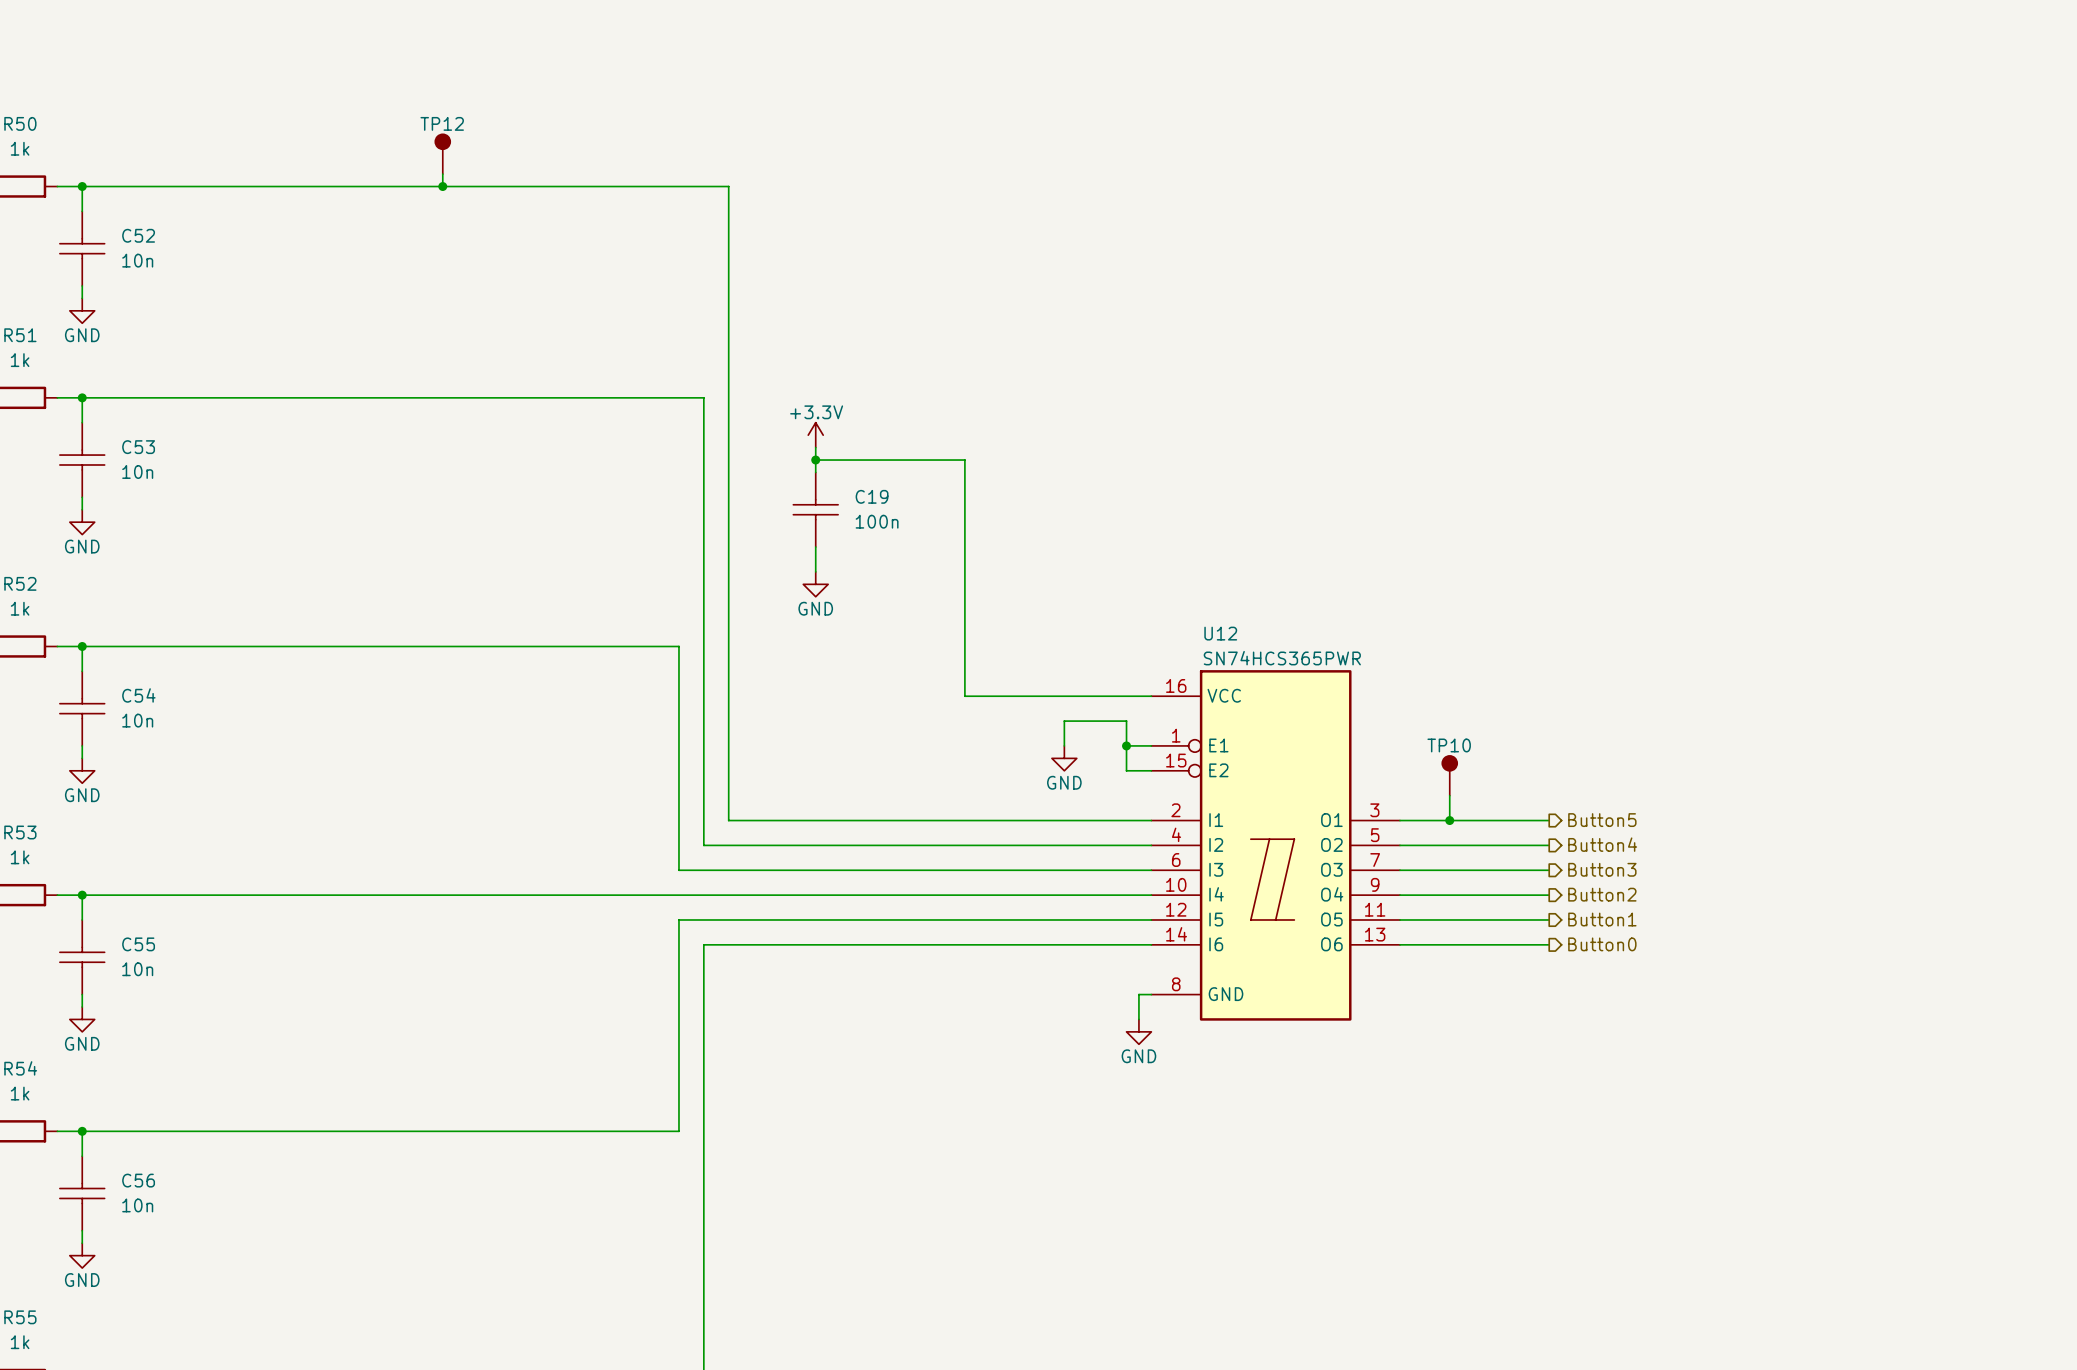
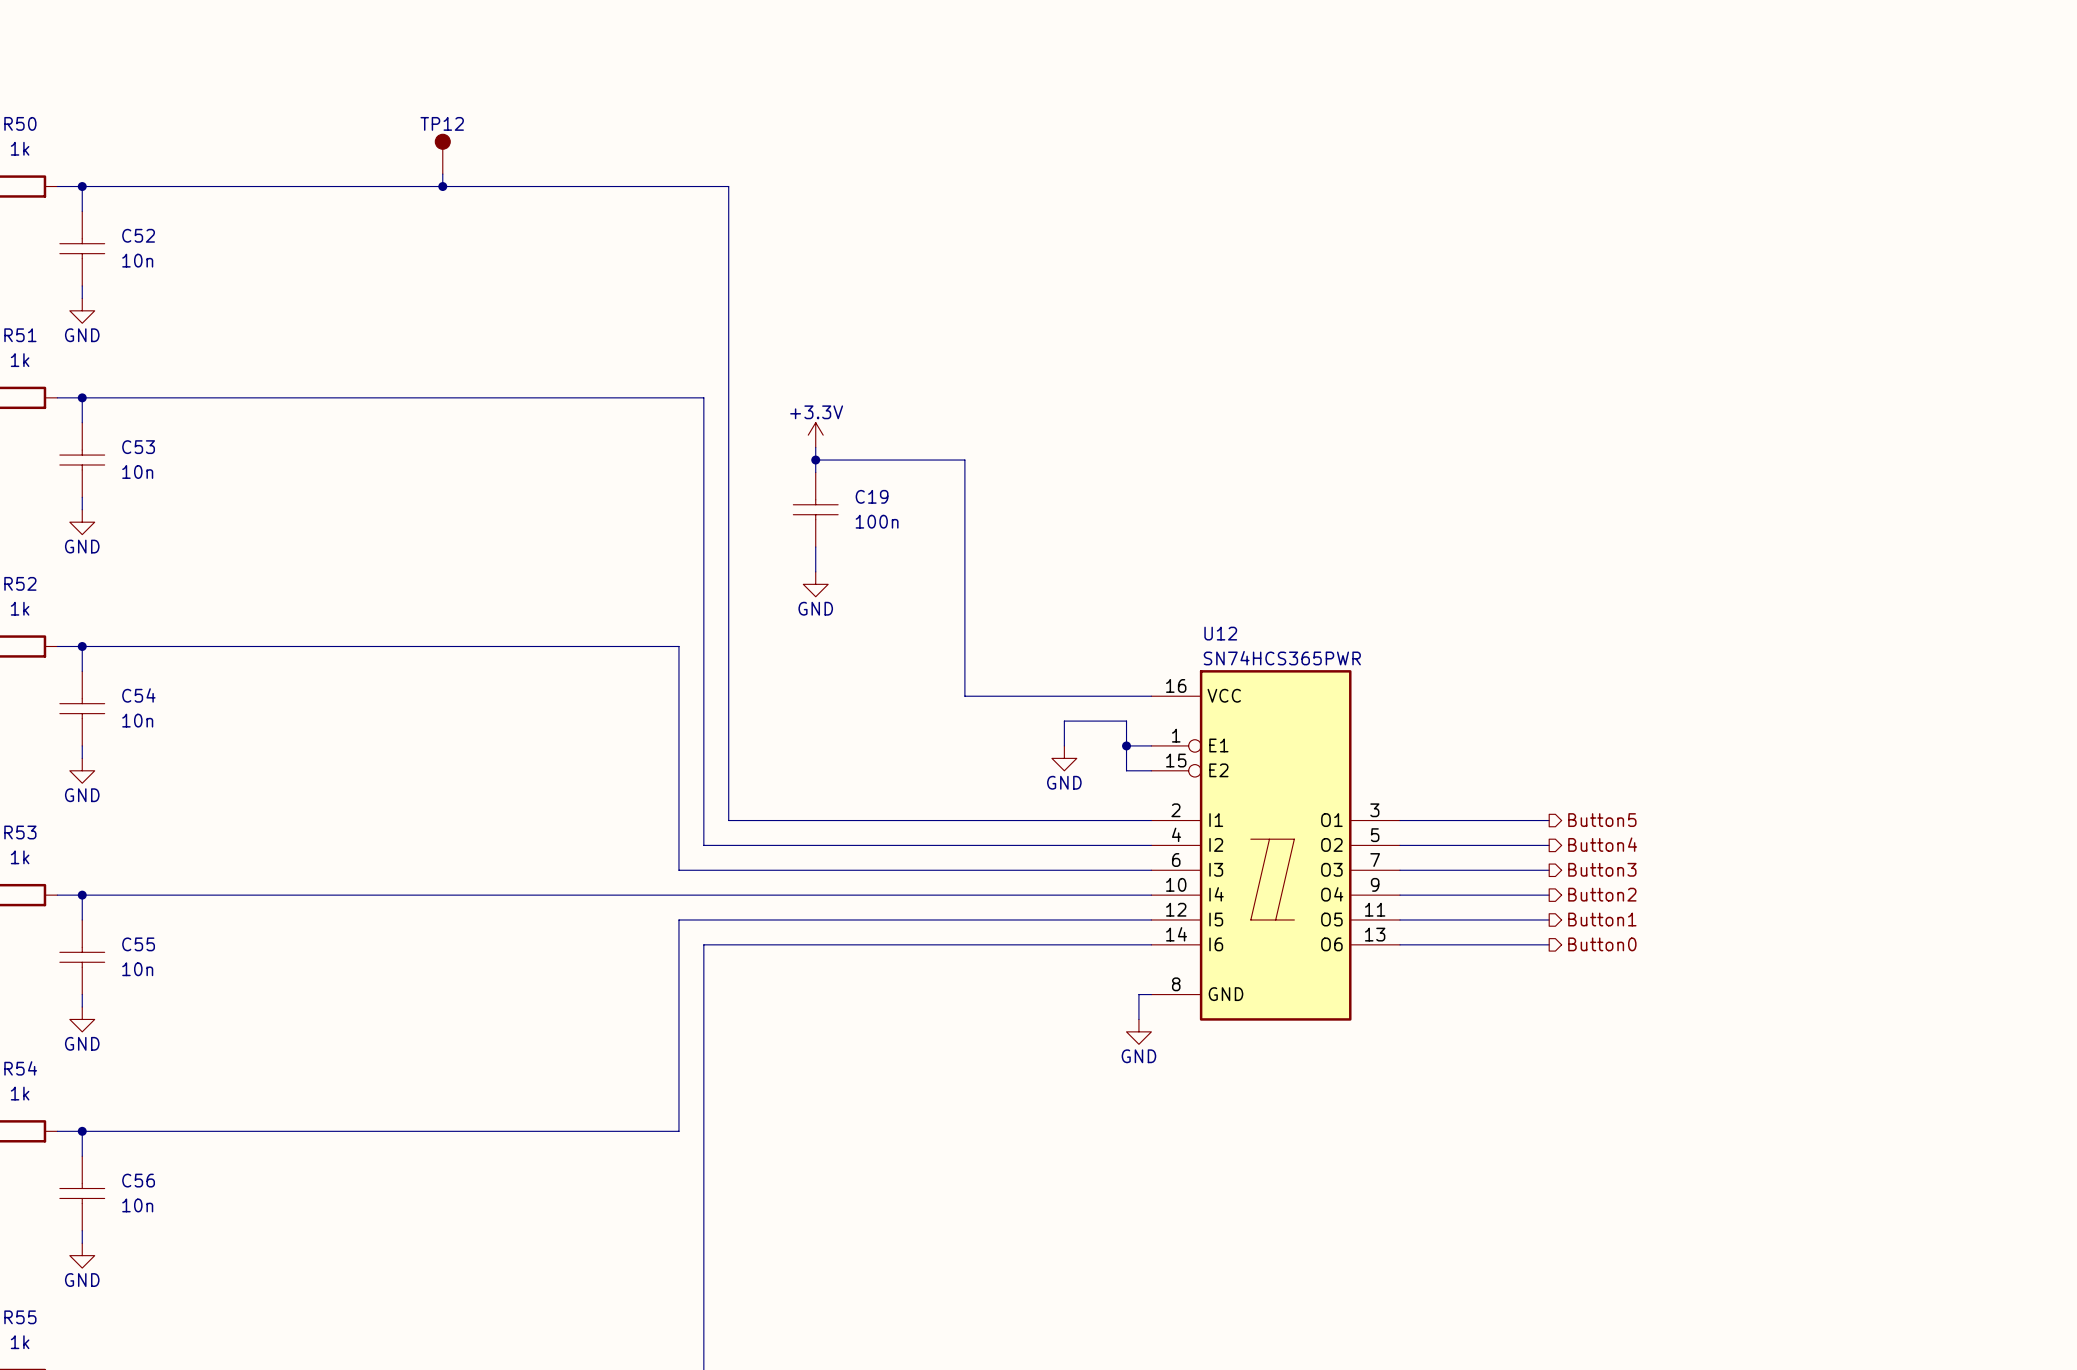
TP10: (1449, 775) -> none
wire: (1449, 795) (1449, 820) -> none
junction: (1449, 820) -> none

